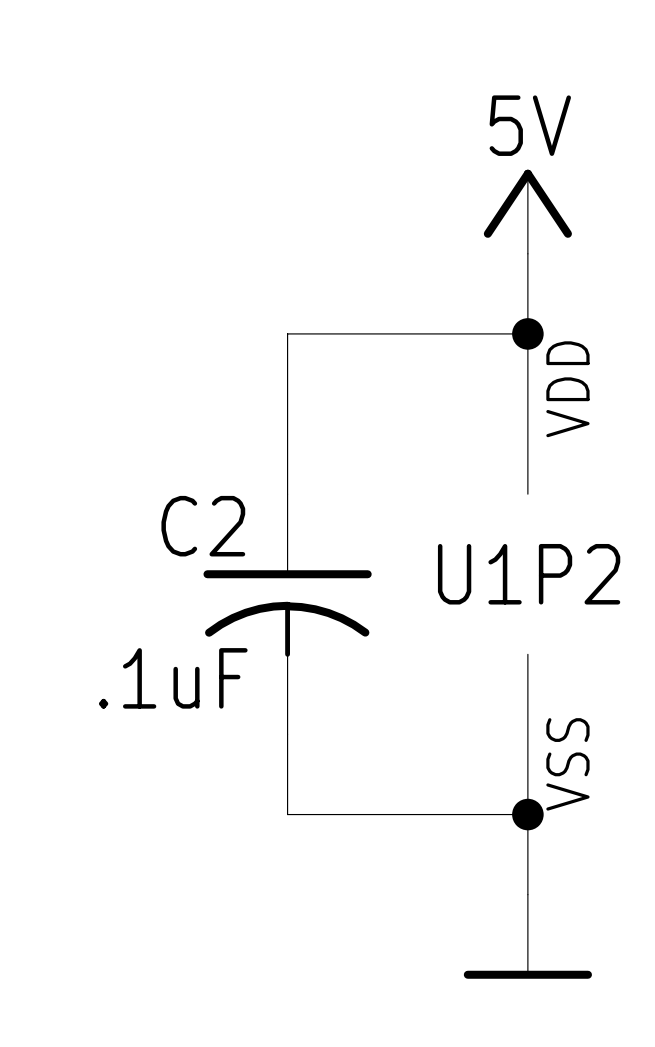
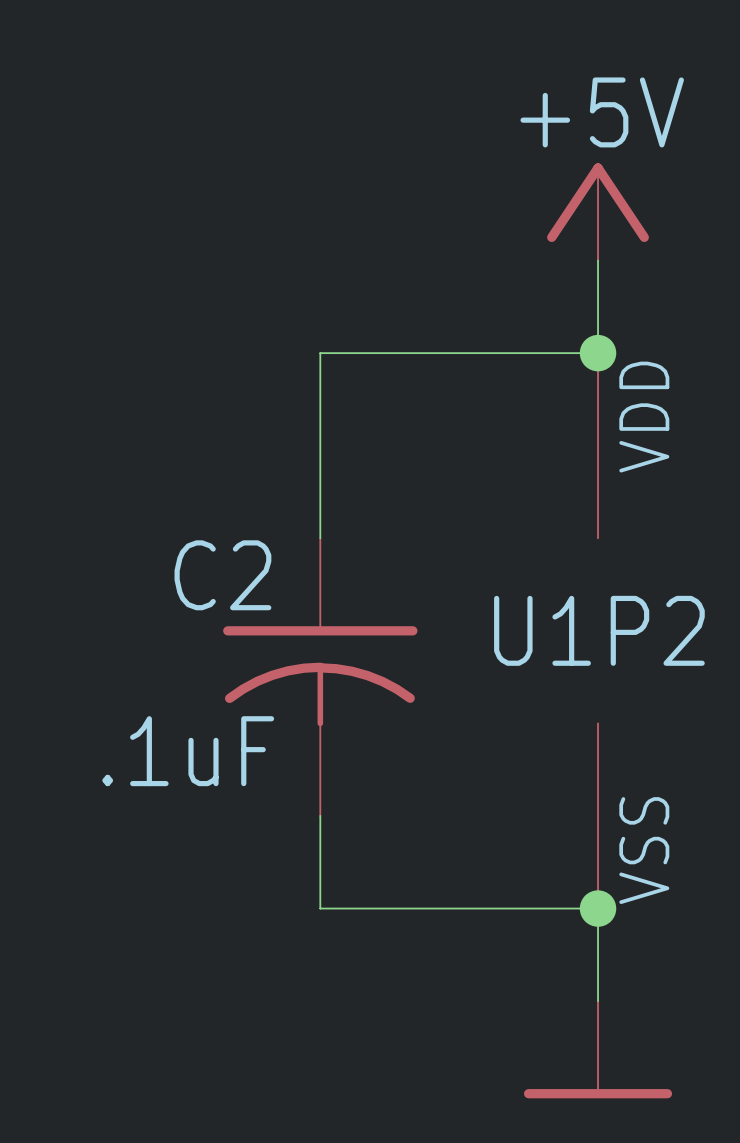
power symbol: 5V (527, 211) -> +5V (598, 211)

